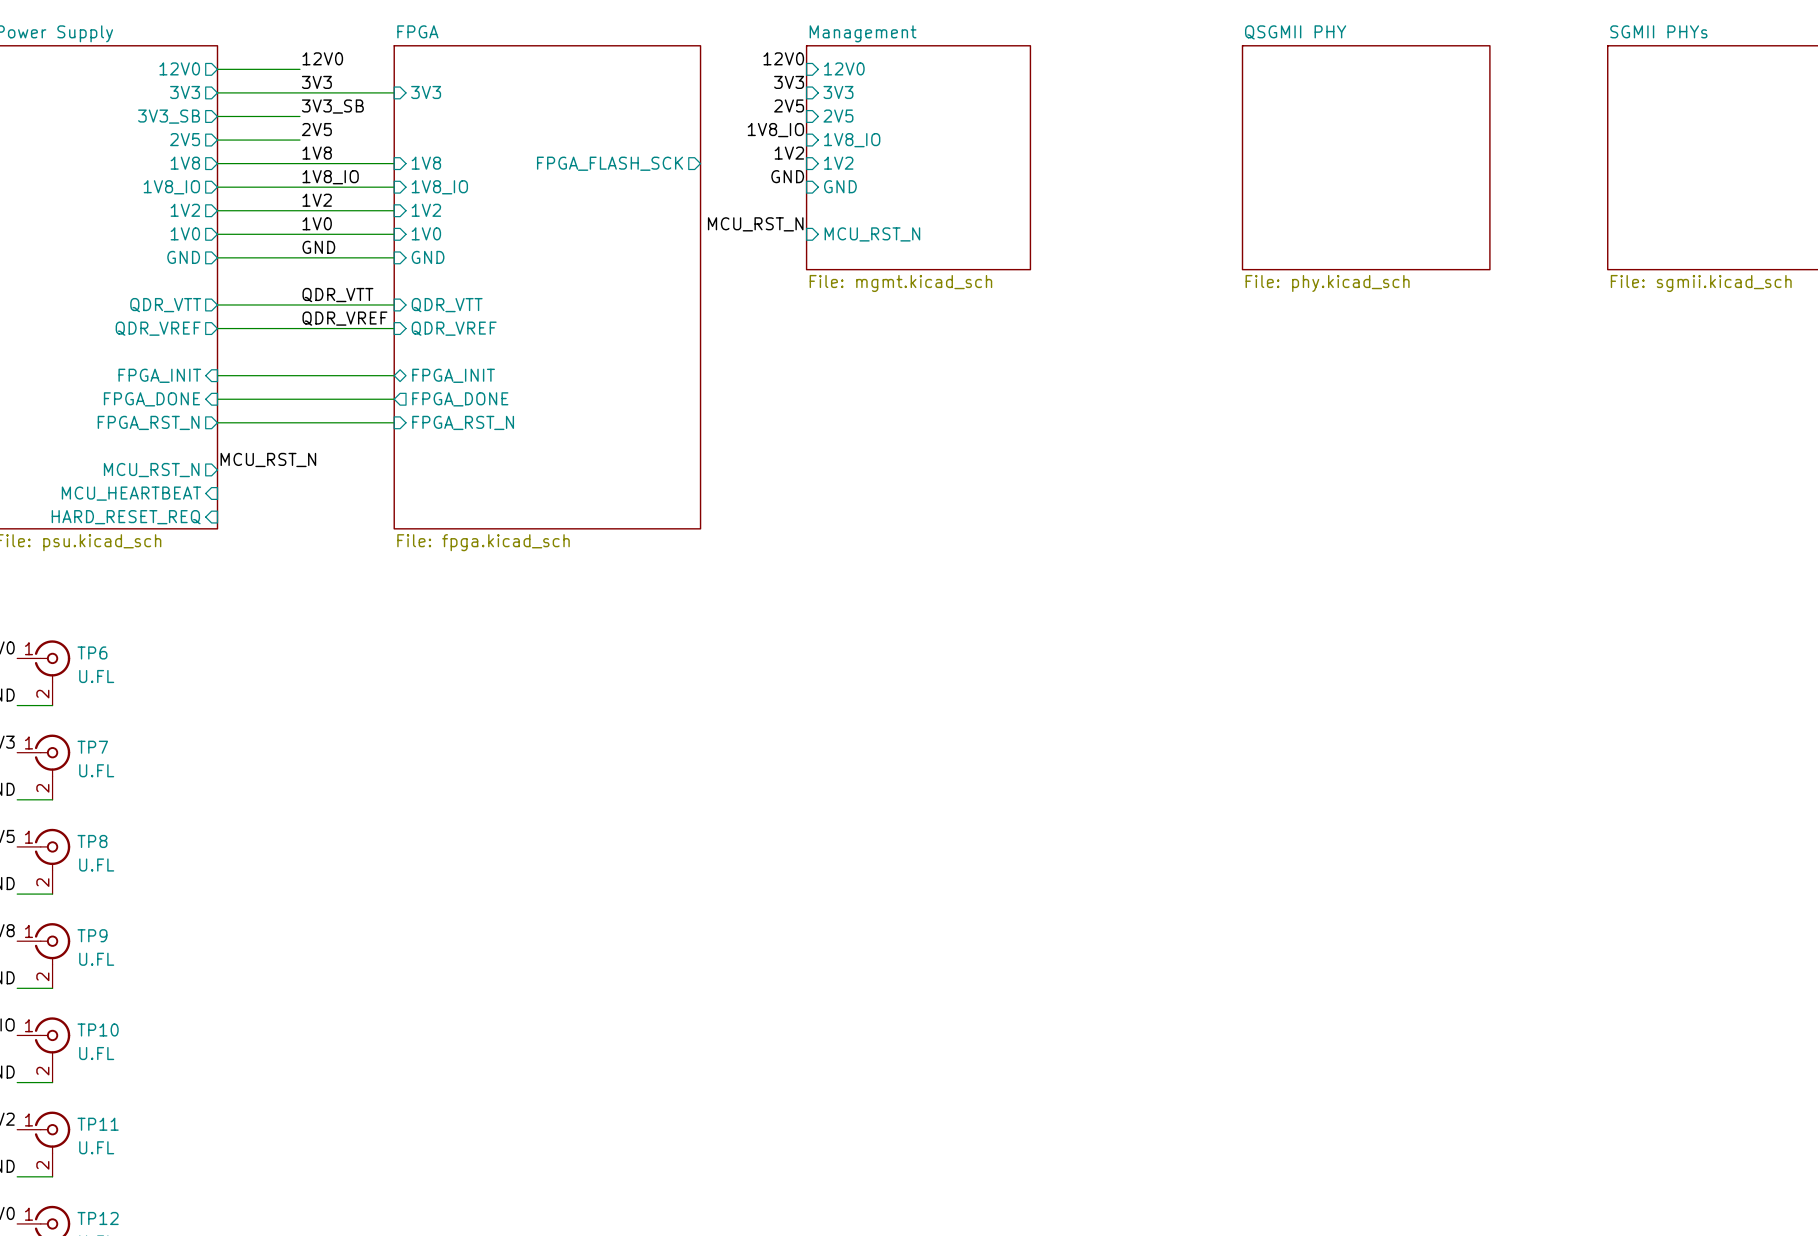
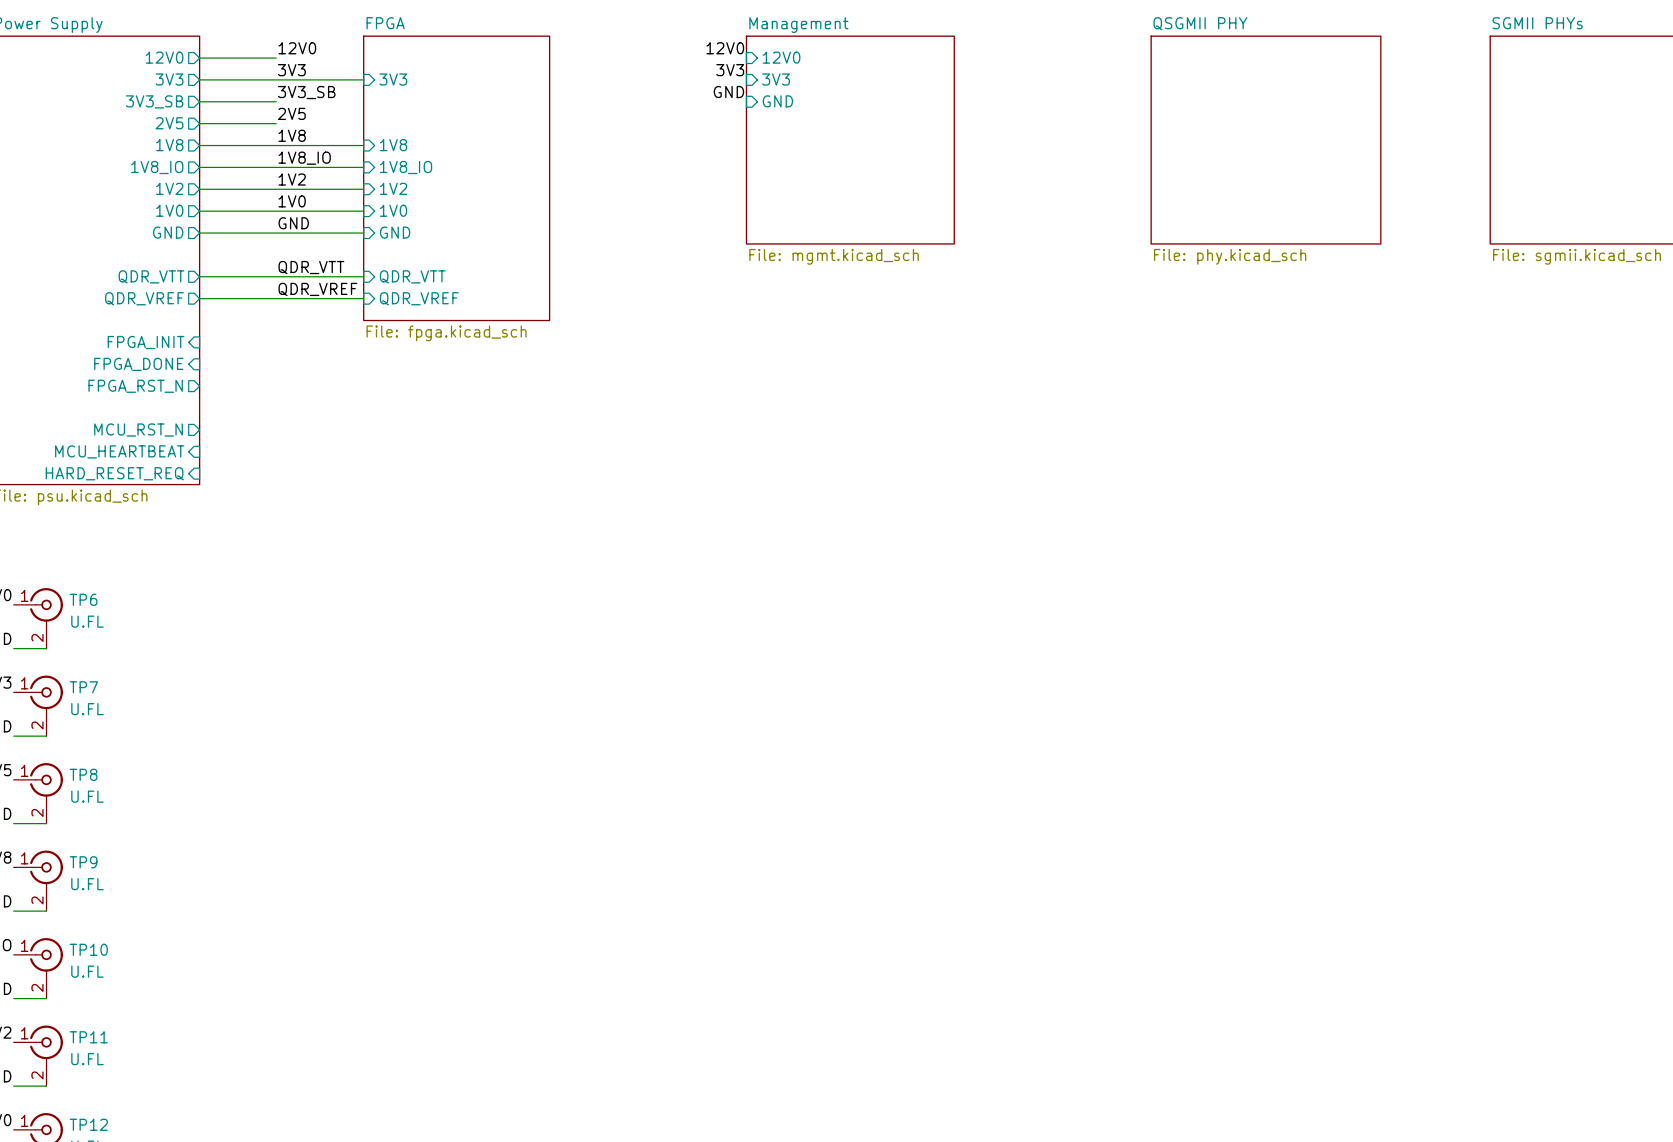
label: 2V5 (789, 105) -> GND (728, 92)
sheet pin: 2V5 (838, 116) -> GND (777, 101)
label: 1V8_IO (775, 130) -> none
sheet pin: 1V8_IO (852, 140) -> none
label: 1V2 (789, 153) -> none
sheet pin: FPGA_FLASH_SCK (610, 163) -> none
sheet pin: 1V2 (838, 163) -> none
label: GND (787, 176) -> none
sheet pin: GND (840, 186) -> none
sheet FPGA: none -> File: fpga.kicad_sch (456, 178)
label: MCU_RST_N (755, 224) -> none
sheet pin: MCU_RST_N (872, 234) -> none
sheet FPGA: File: fpga.kicad_sch (547, 287) -> none
wire: (217, 375) (394, 375) -> none
sheet pin: FPGA_INIT (453, 375) -> none
wire: (217, 399) (394, 399) -> none
sheet pin: FPGA_DONE (460, 399) -> none
wire: (217, 422) (394, 422) -> none
sheet pin: FPGA_RST_N (463, 422) -> none
label: MCU_RST_N (268, 459) -> none

